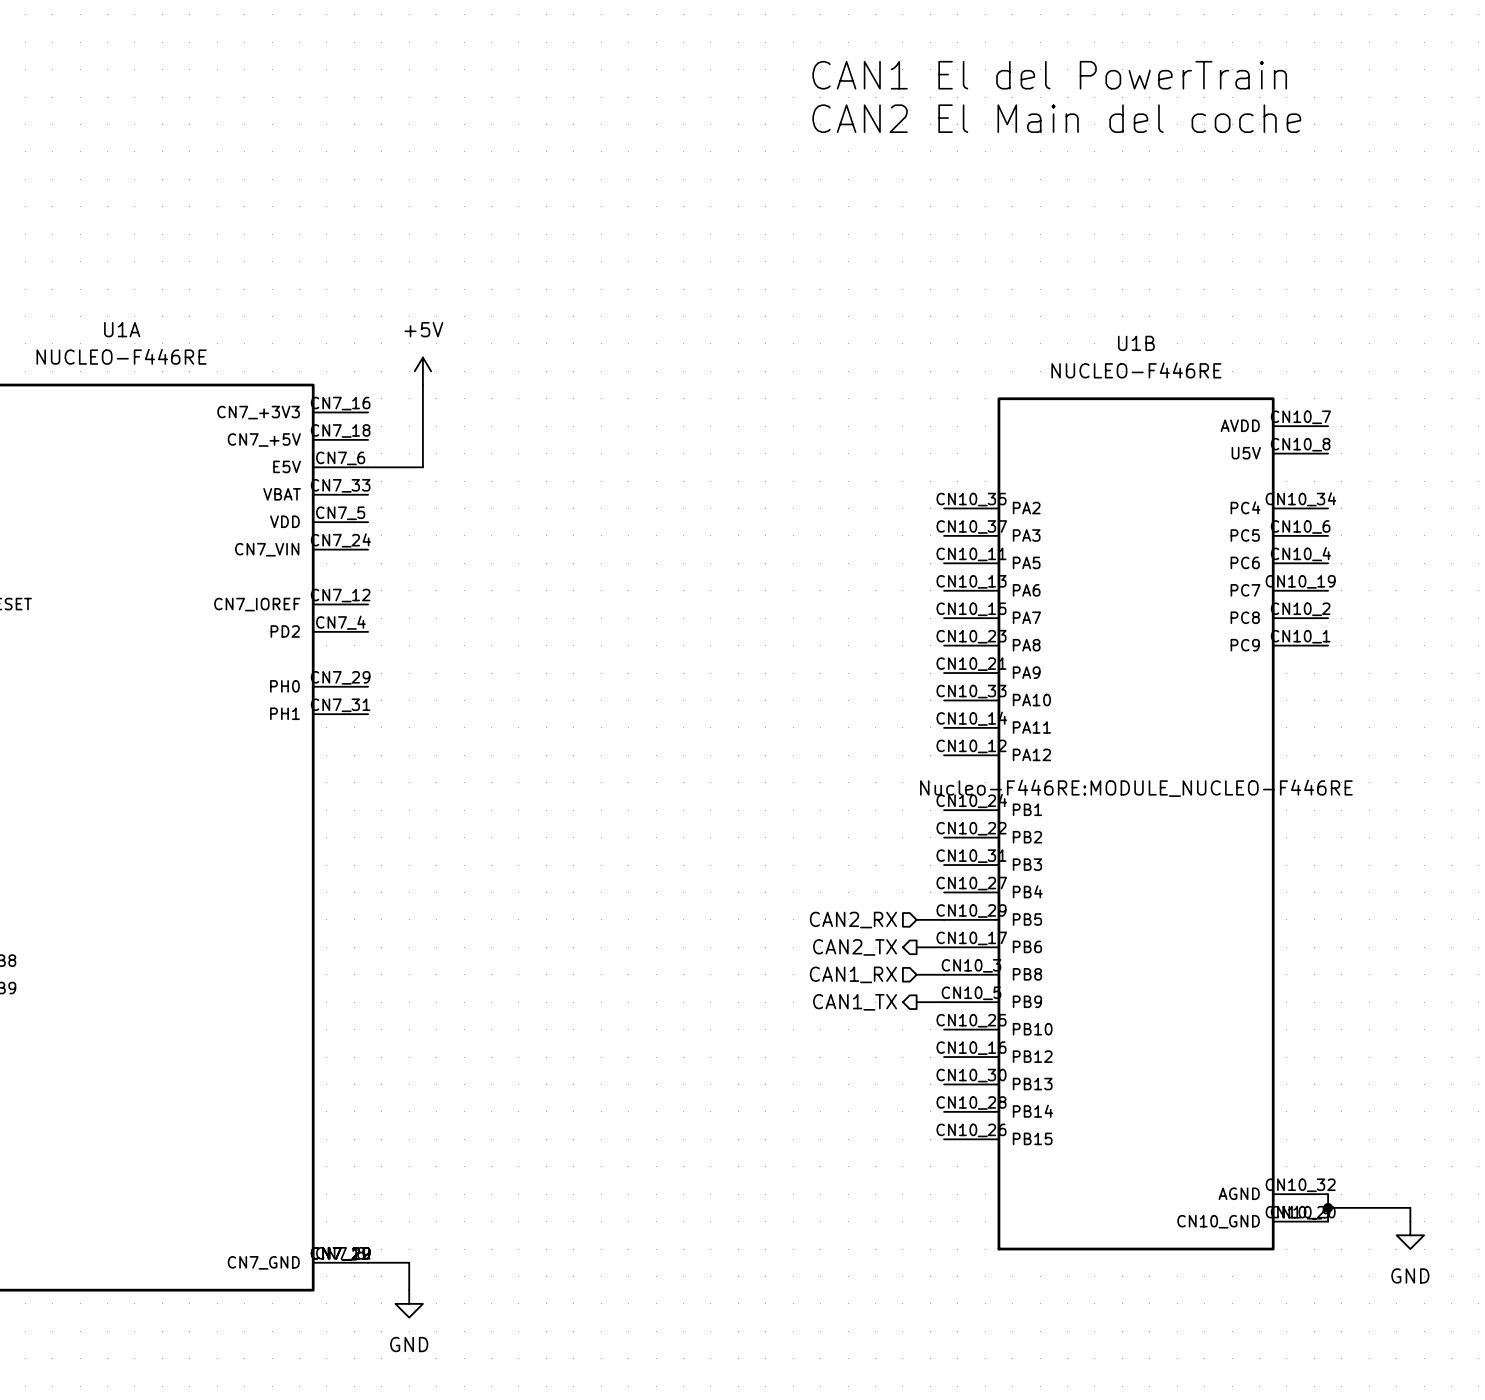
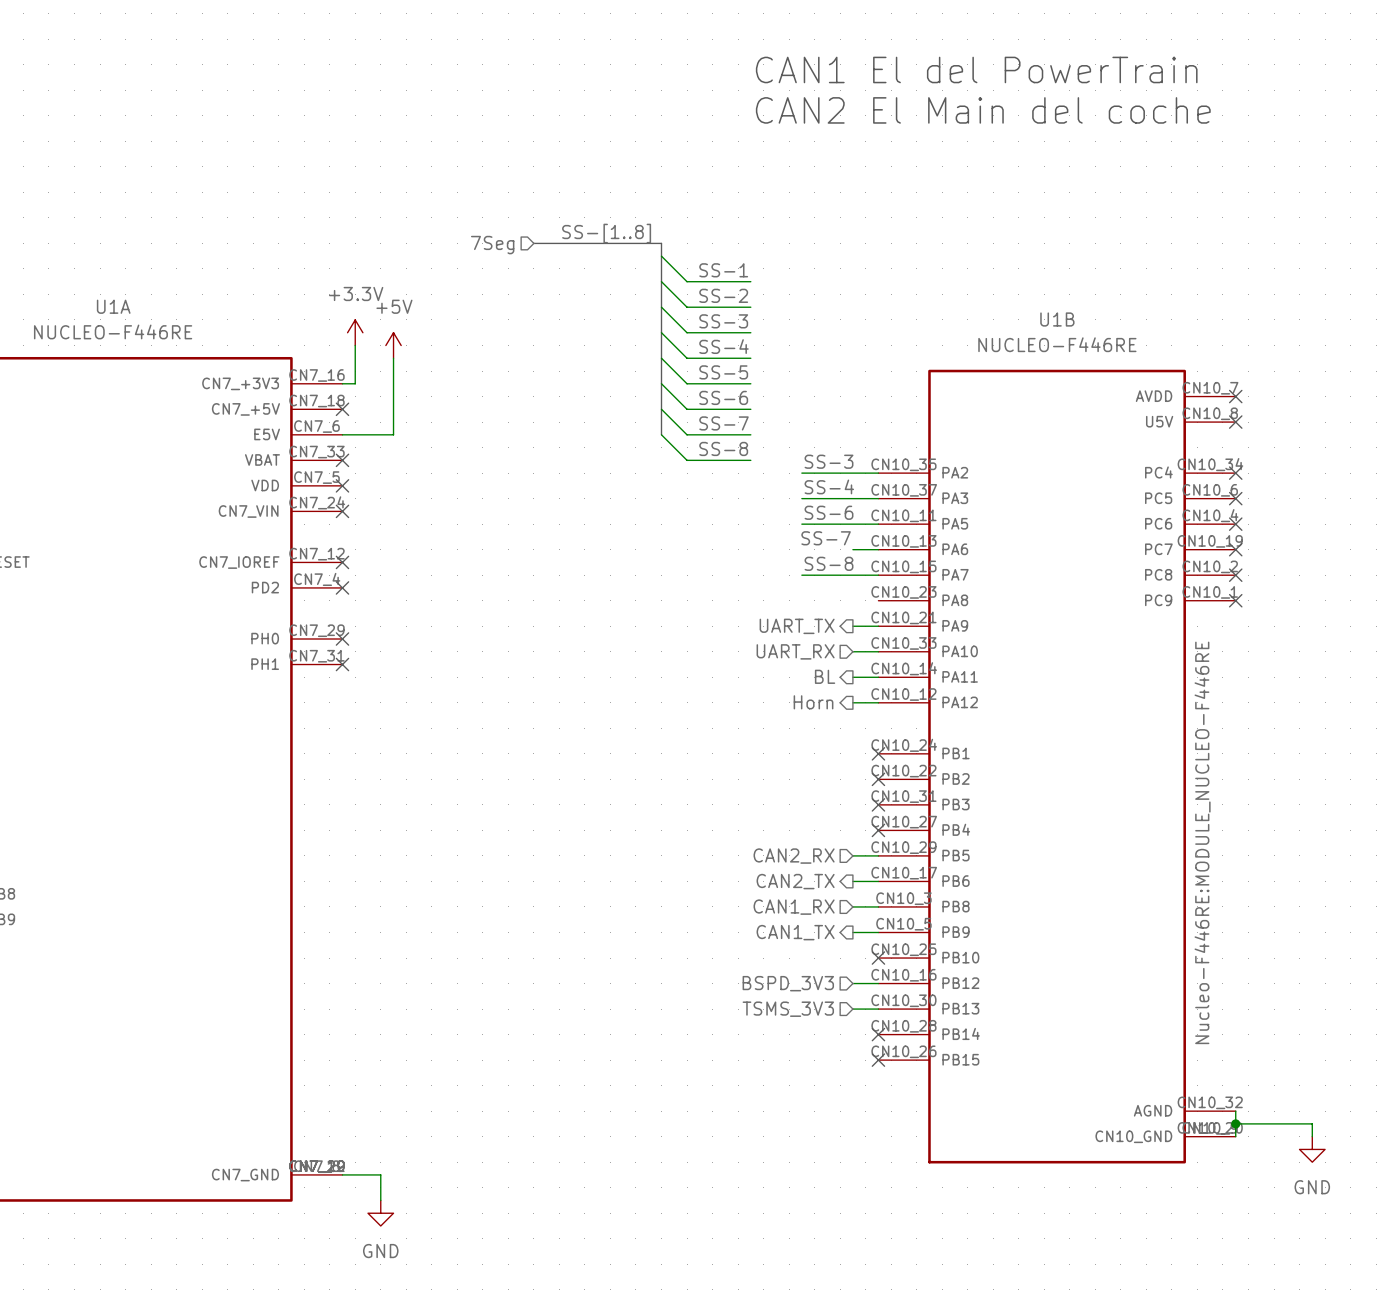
label: none -> SS-[1..8] (606, 233)
bus: none -> (533, 243) (661, 243) (661, 434)
hierarchical label: none -> 7Seg (492, 245)
wire: none -> (661, 256) (687, 281) (750, 281)
label: none -> SS-1 (723, 270)
wire: none -> (661, 281) (687, 307) (750, 307)
label: none -> SS-2 (723, 295)
wire: none -> (661, 307) (687, 332) (750, 332)
label: none -> SS-3 (723, 321)
power symbol: none -> +3.3V (355, 332)
wire: none -> (661, 332) (687, 358) (750, 358)
wire: none -> (355, 345) (355, 383) (342, 383)
label: none -> SS-4 (723, 346)
wire: none -> (661, 358) (687, 383) (750, 383)
label: none -> SS-5 (723, 372)
wire: none -> (661, 383) (687, 409) (750, 409)
no-connect mark: none -> (1235, 396)
label: none -> SS-6 (723, 397)
no-connect mark: none -> (342, 409)
wire: none -> (661, 409) (687, 434) (750, 434)
no-connect mark: none -> (1235, 422)
label: none -> SS-7 (723, 423)
wire: none -> (661, 434) (687, 460) (750, 460)
label: none -> SS-8 (723, 448)
no-connect mark: none -> (342, 460)
label: none -> SS-3 (829, 461)
wire: none -> (801, 473) (878, 473)
no-connect mark: none -> (1235, 473)
no-connect mark: none -> (342, 485)
label: none -> SS-4 (829, 486)
wire: none -> (801, 498) (878, 498)
no-connect mark: none -> (1235, 498)
no-connect mark: none -> (342, 511)
label: none -> SS-6 (829, 512)
wire: none -> (801, 524) (878, 524)
no-connect mark: none -> (1235, 524)
label: none -> SS-7 (826, 538)
wire: none -> (852, 549) (878, 549)
no-connect mark: none -> (1235, 549)
no-connect mark: none -> (342, 562)
label: none -> SS-8 (829, 563)
wire: none -> (801, 575) (878, 575)
no-connect mark: none -> (1235, 575)
no-connect mark: none -> (342, 587)
no-connect mark: none -> (1235, 600)
hierarchical label: none -> UART_TX (797, 626)
wire: none -> (852, 626) (878, 626)
no-connect mark: none -> (342, 639)
hierarchical label: none -> UART_RX (795, 651)
wire: none -> (852, 651) (878, 651)
no-connect mark: none -> (342, 664)
hierarchical label: none -> BL (825, 676)
wire: none -> (852, 677) (878, 677)
hierarchical label: none -> Horn (813, 702)
wire: none -> (852, 702) (878, 702)
U1B text rotation: 0° (1136, 788) -> 90° counterclockwise (1202, 842)
no-connect mark: none -> (878, 753)
no-connect mark: none -> (878, 779)
no-connect mark: none -> (878, 804)
no-connect mark: none -> (878, 830)
no-connect mark: none -> (878, 958)
hierarchical label: none -> BSPD_3V3 (788, 983)
wire: none -> (852, 983) (878, 983)
hierarchical label: none -> TSMS_3V3 (788, 1009)
wire: none -> (852, 1009) (878, 1009)
no-connect mark: none -> (878, 1034)
no-connect mark: none -> (878, 1060)

